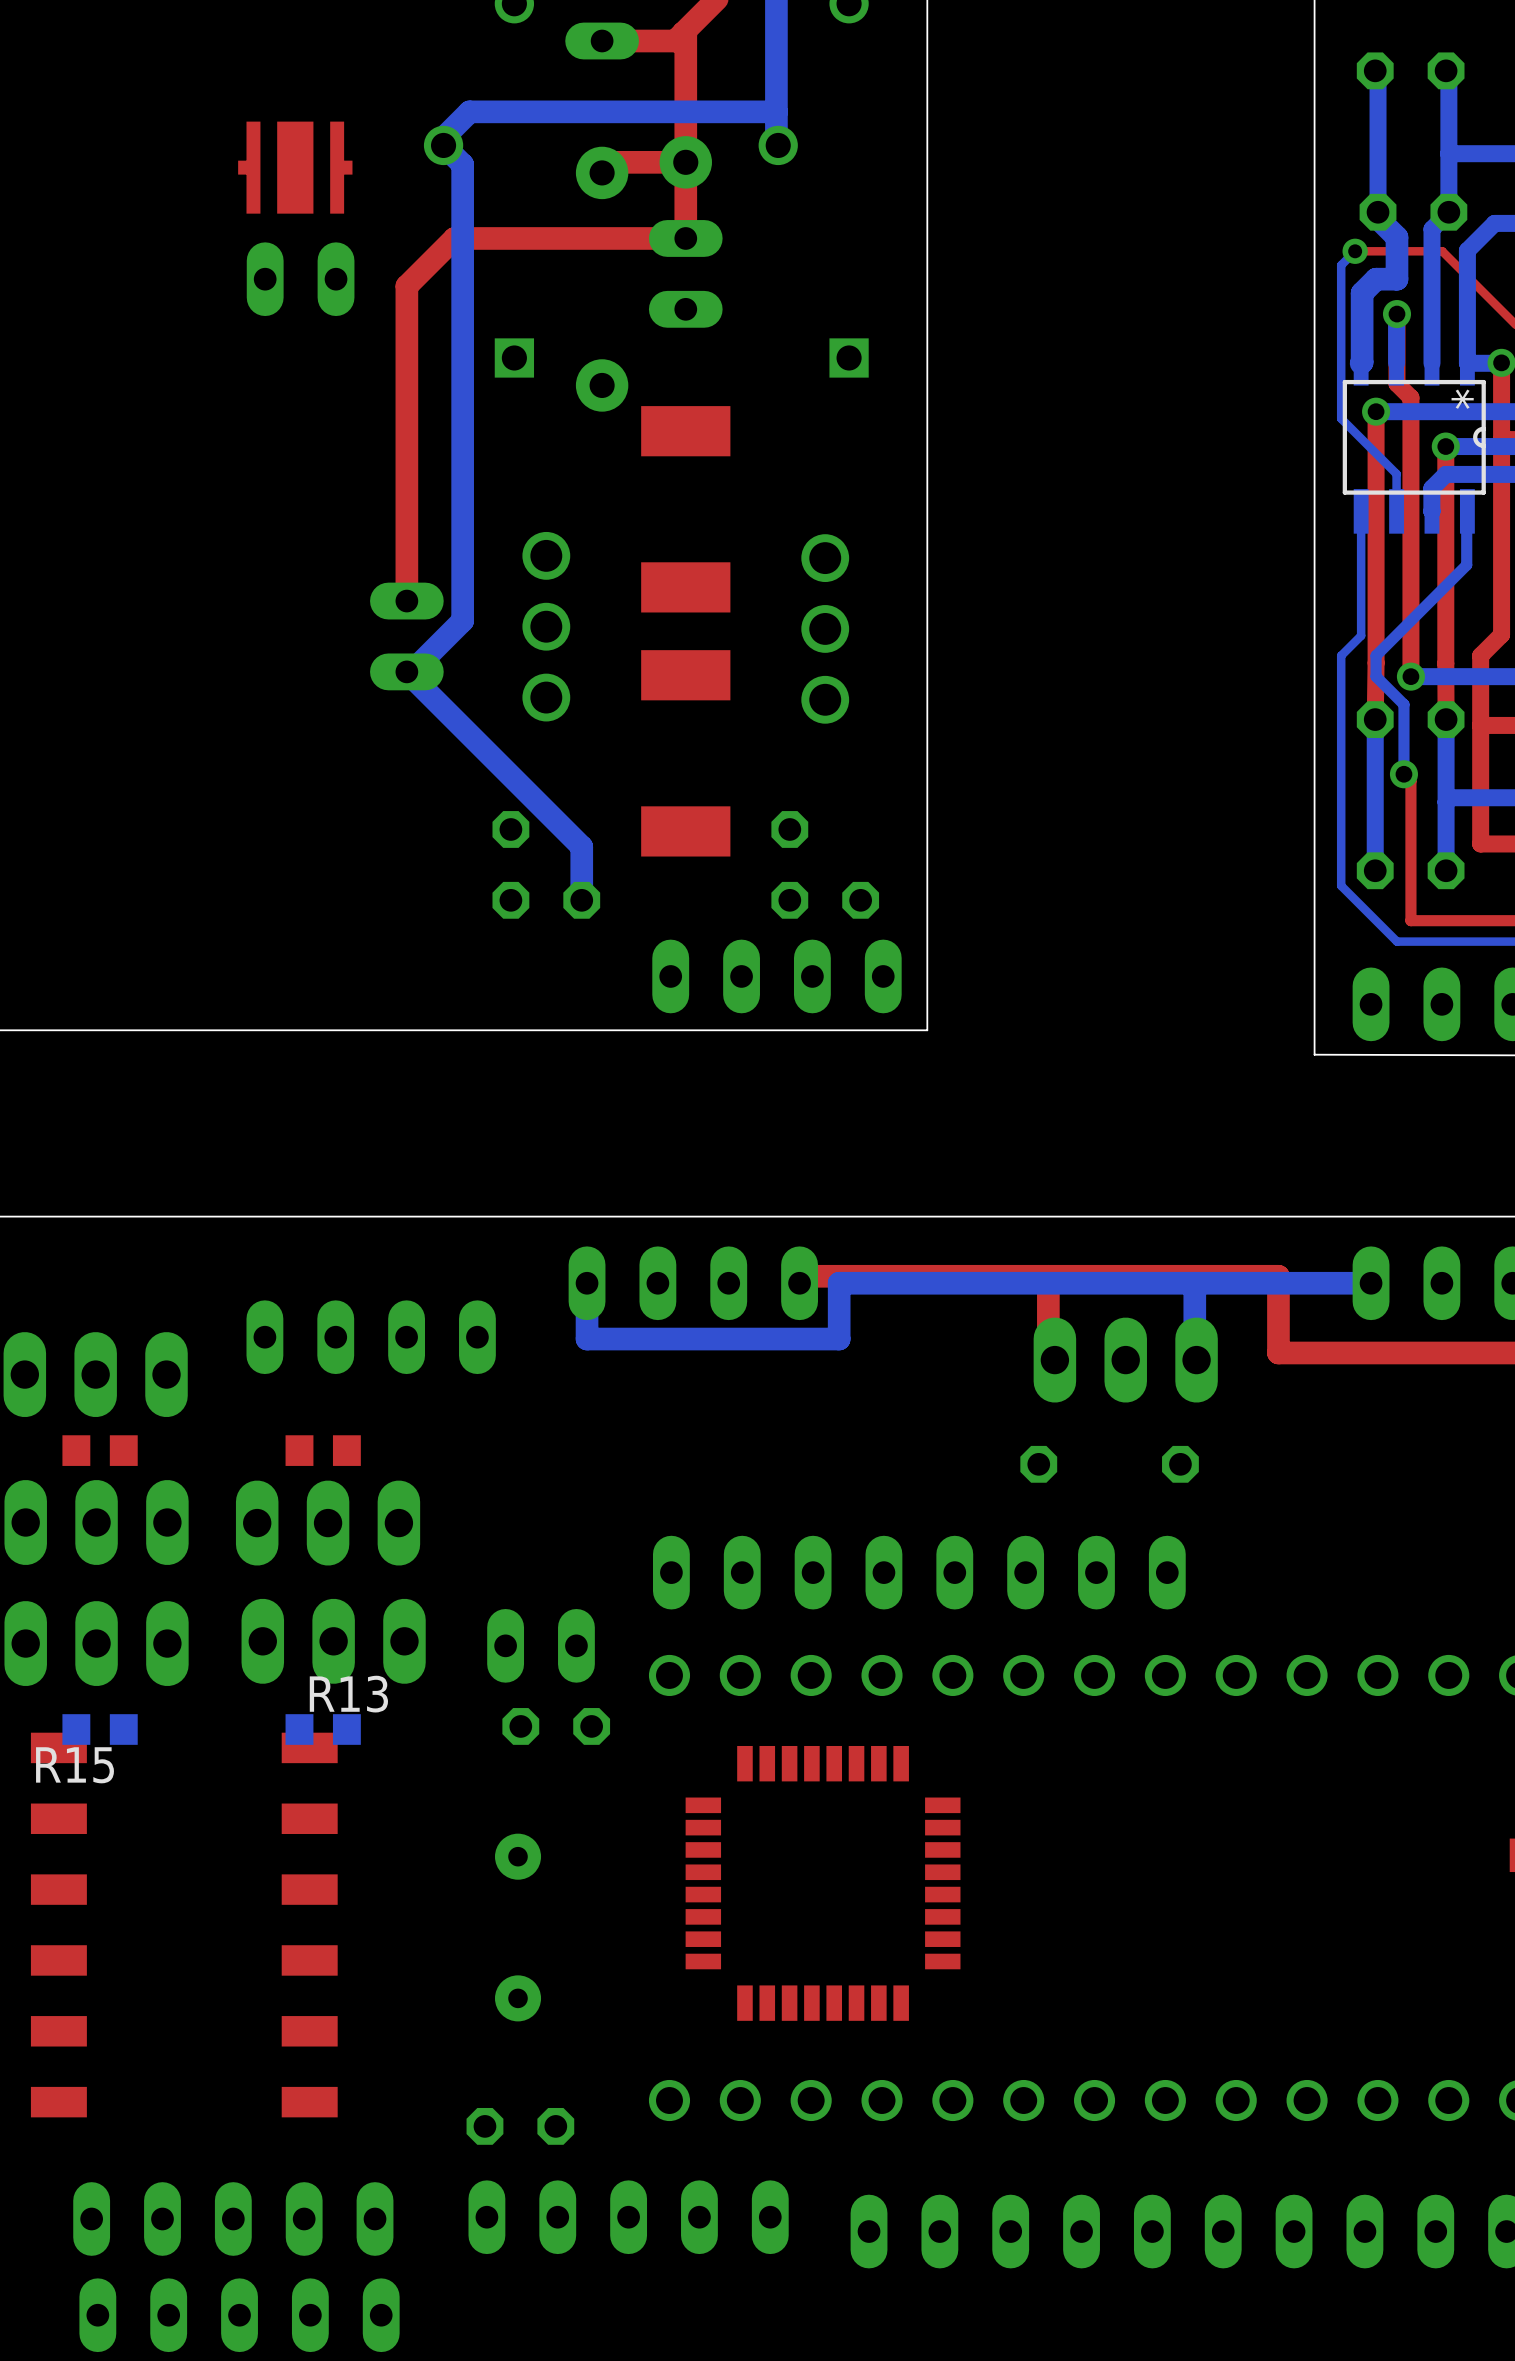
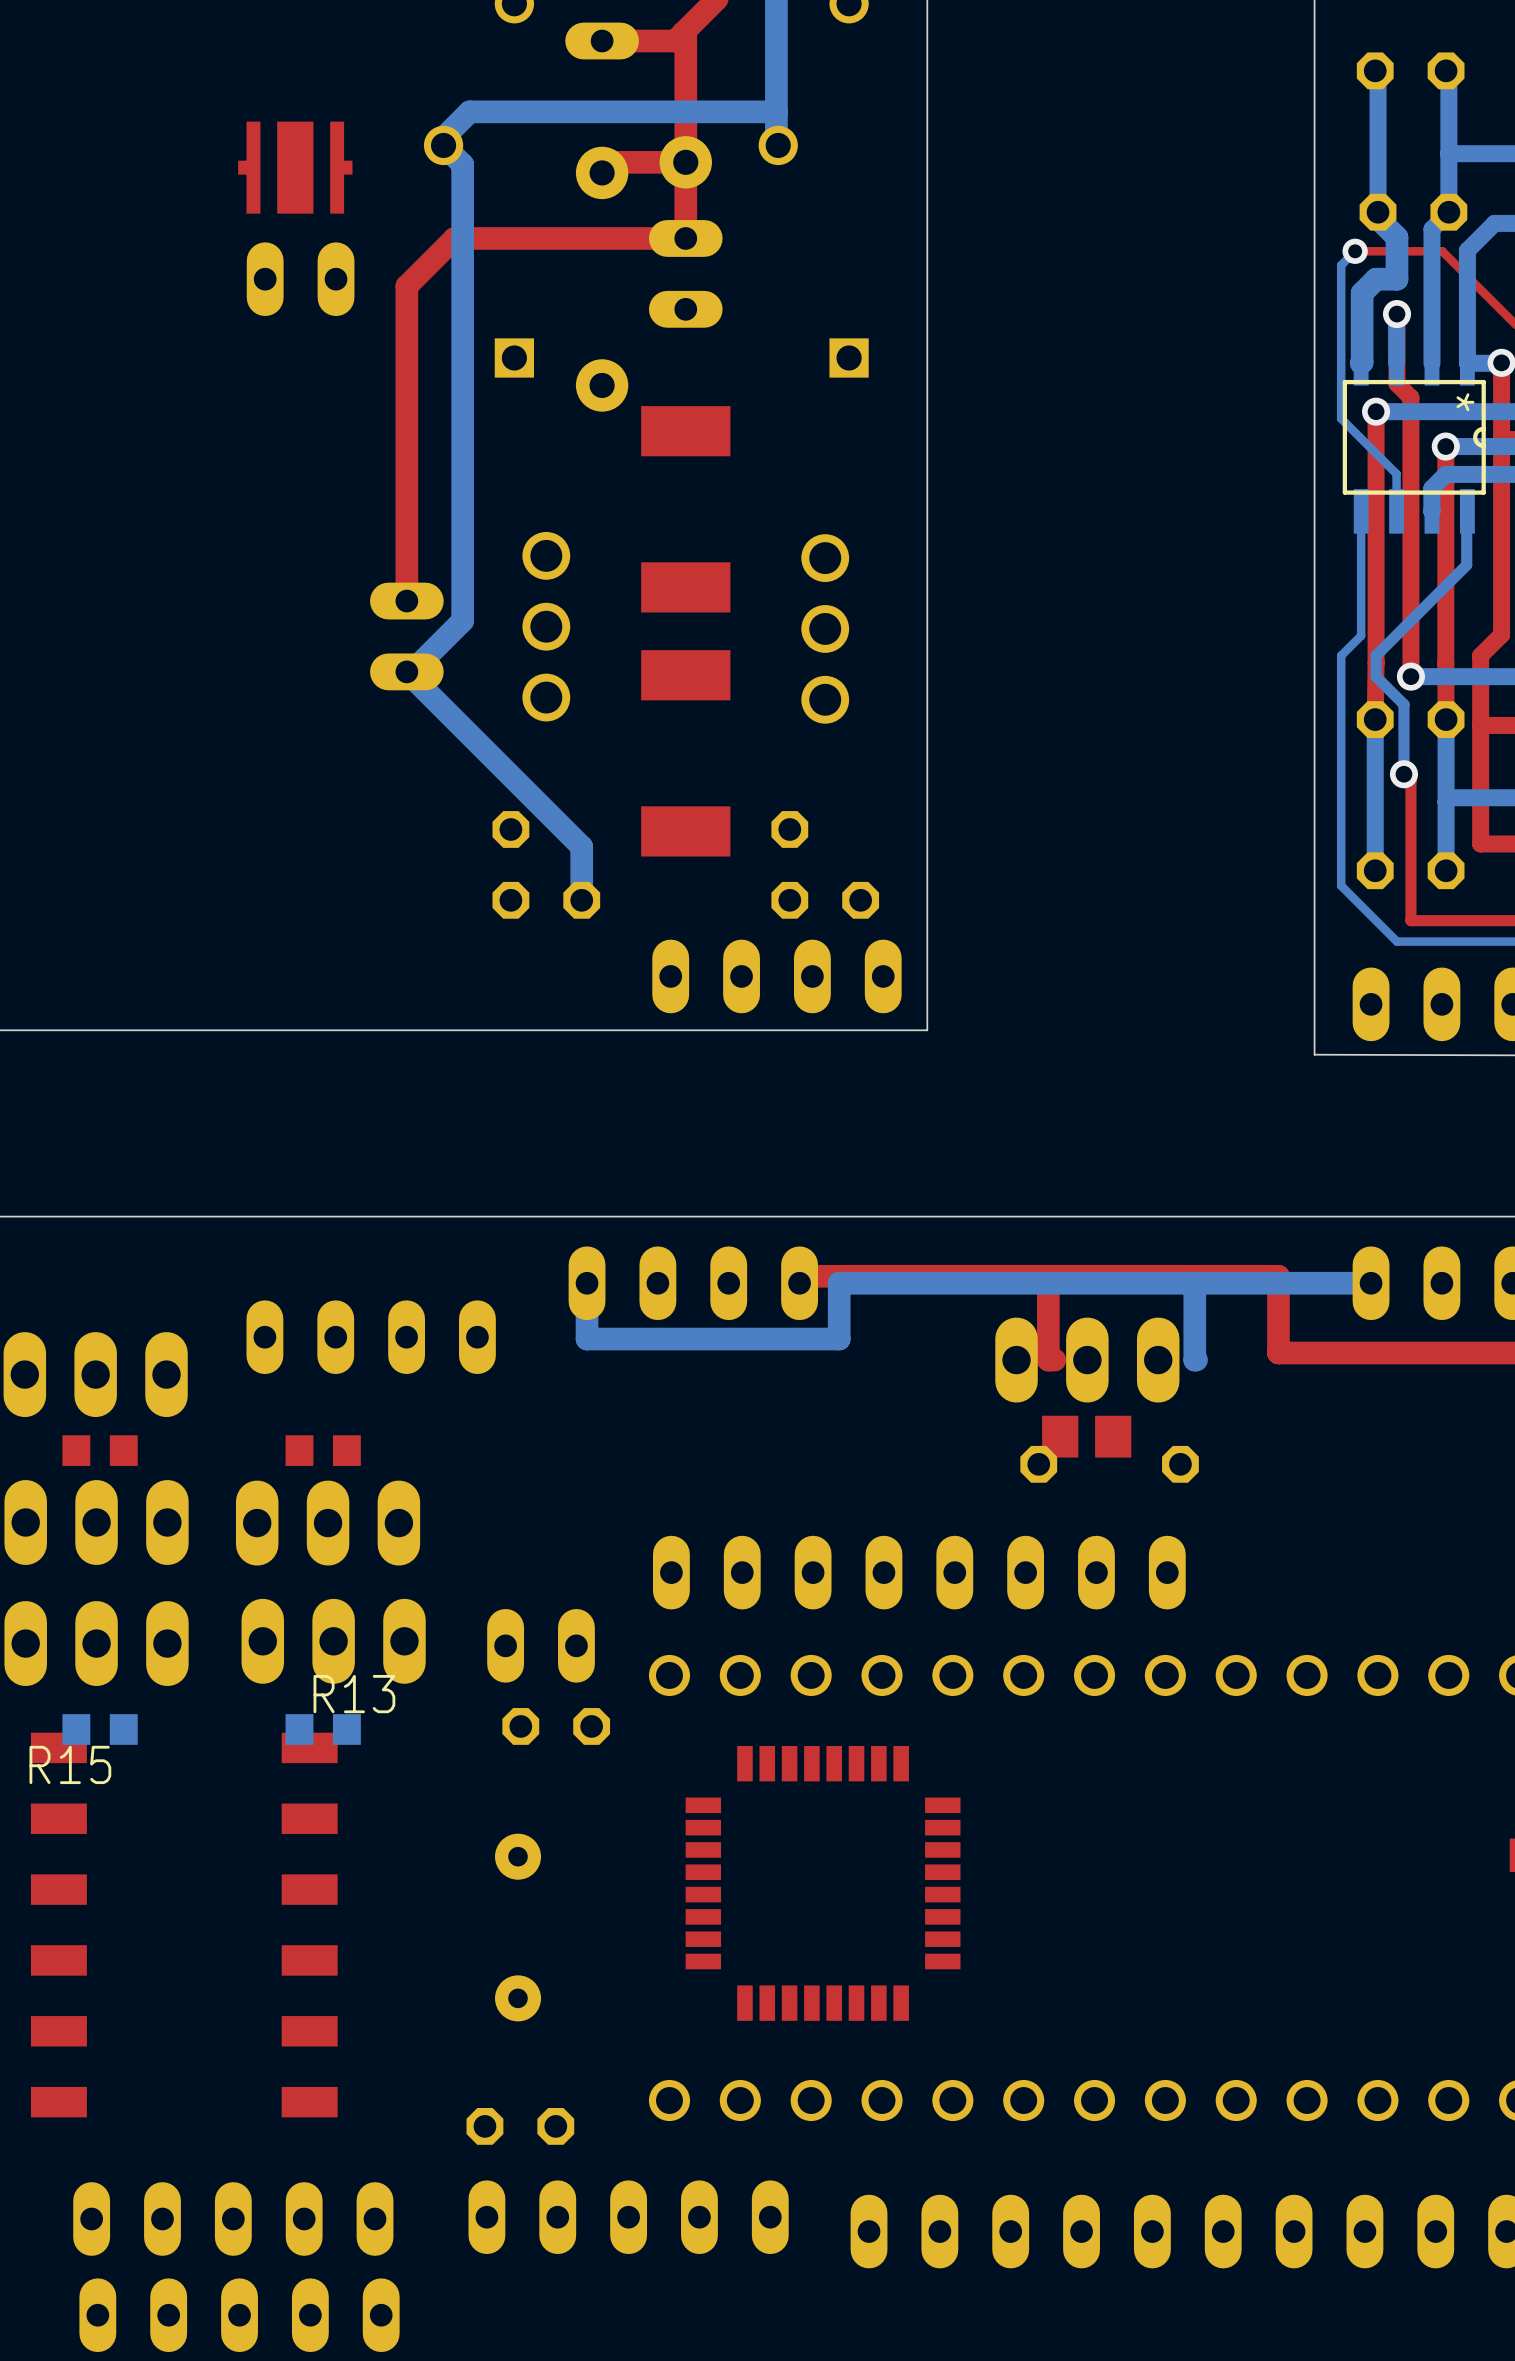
part position: (1125, 1360) -> (1087, 1360)
part: none -> (1086, 1436)

